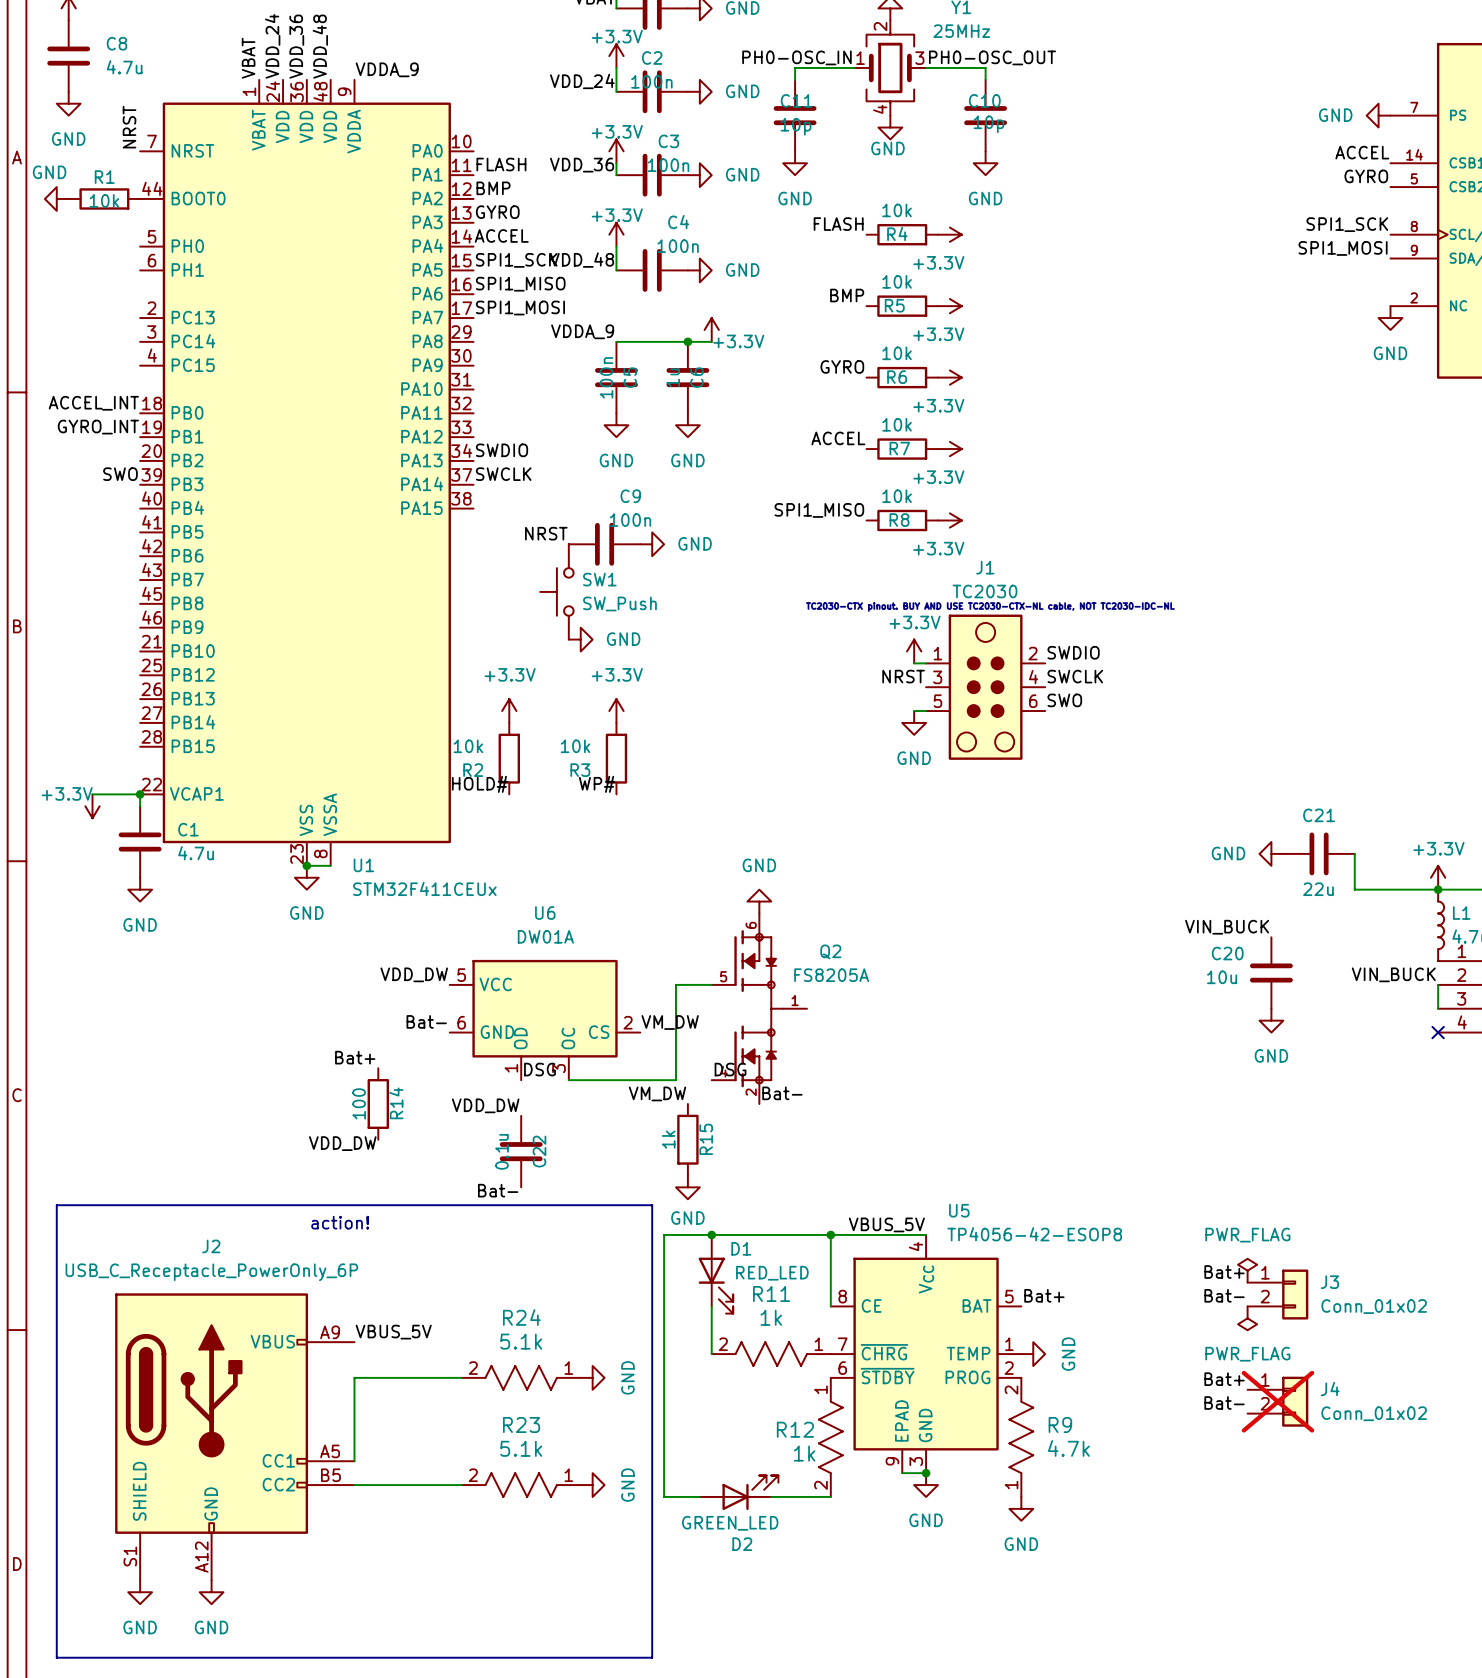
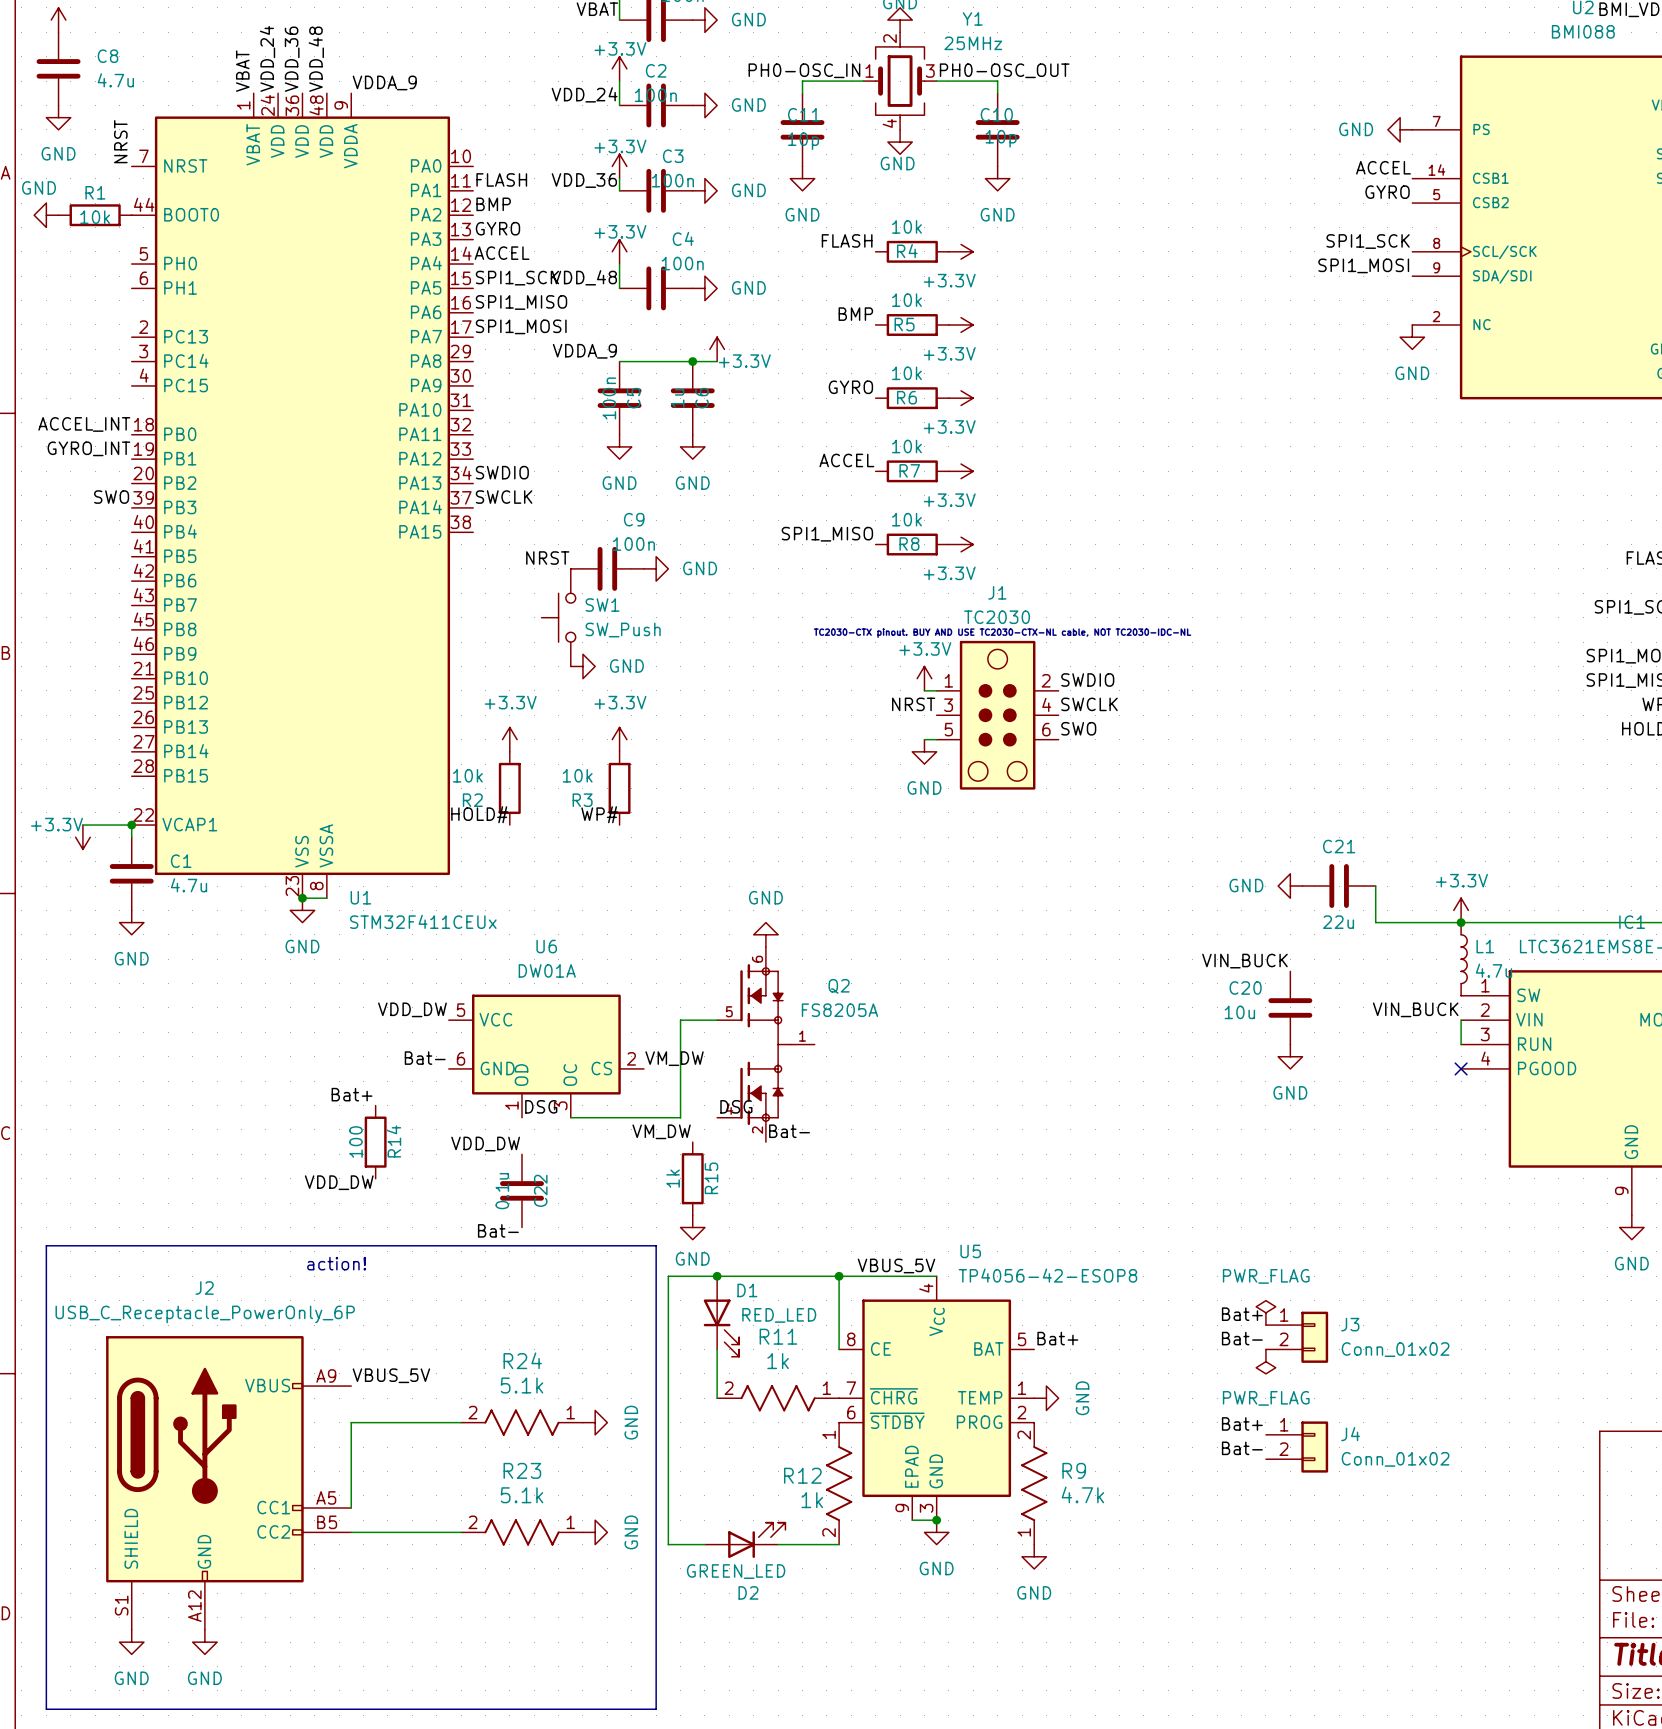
J4 do-not-place cross: (1277, 1401) -> none

